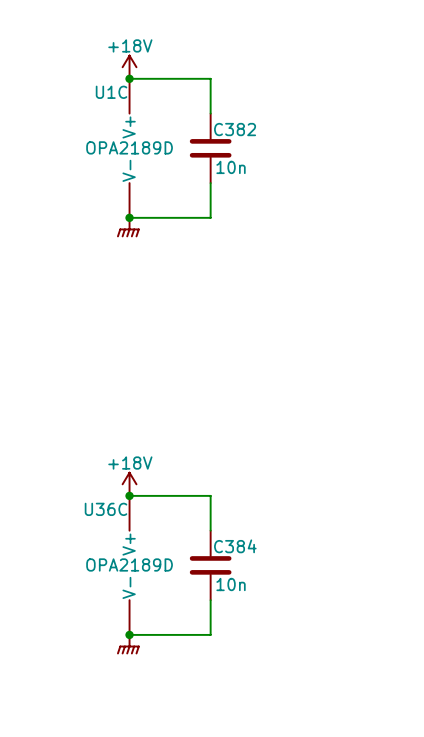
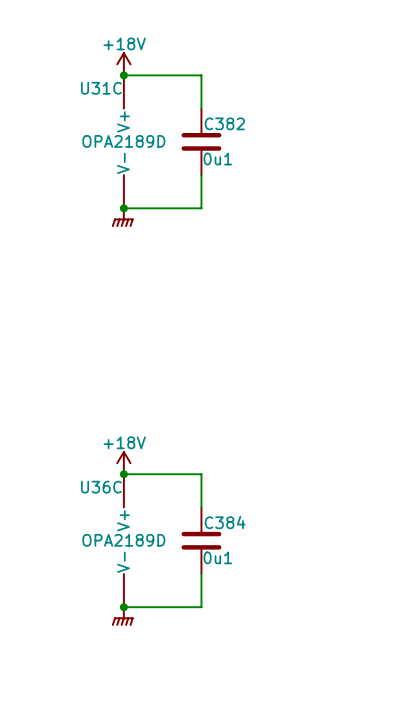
U1C name: U1C (111, 92) -> U31C (101, 88)
C382 value: 10n (231, 167) -> 0u1 (217, 159)
C384 value: 10n (231, 584) -> 0u1 (217, 557)

